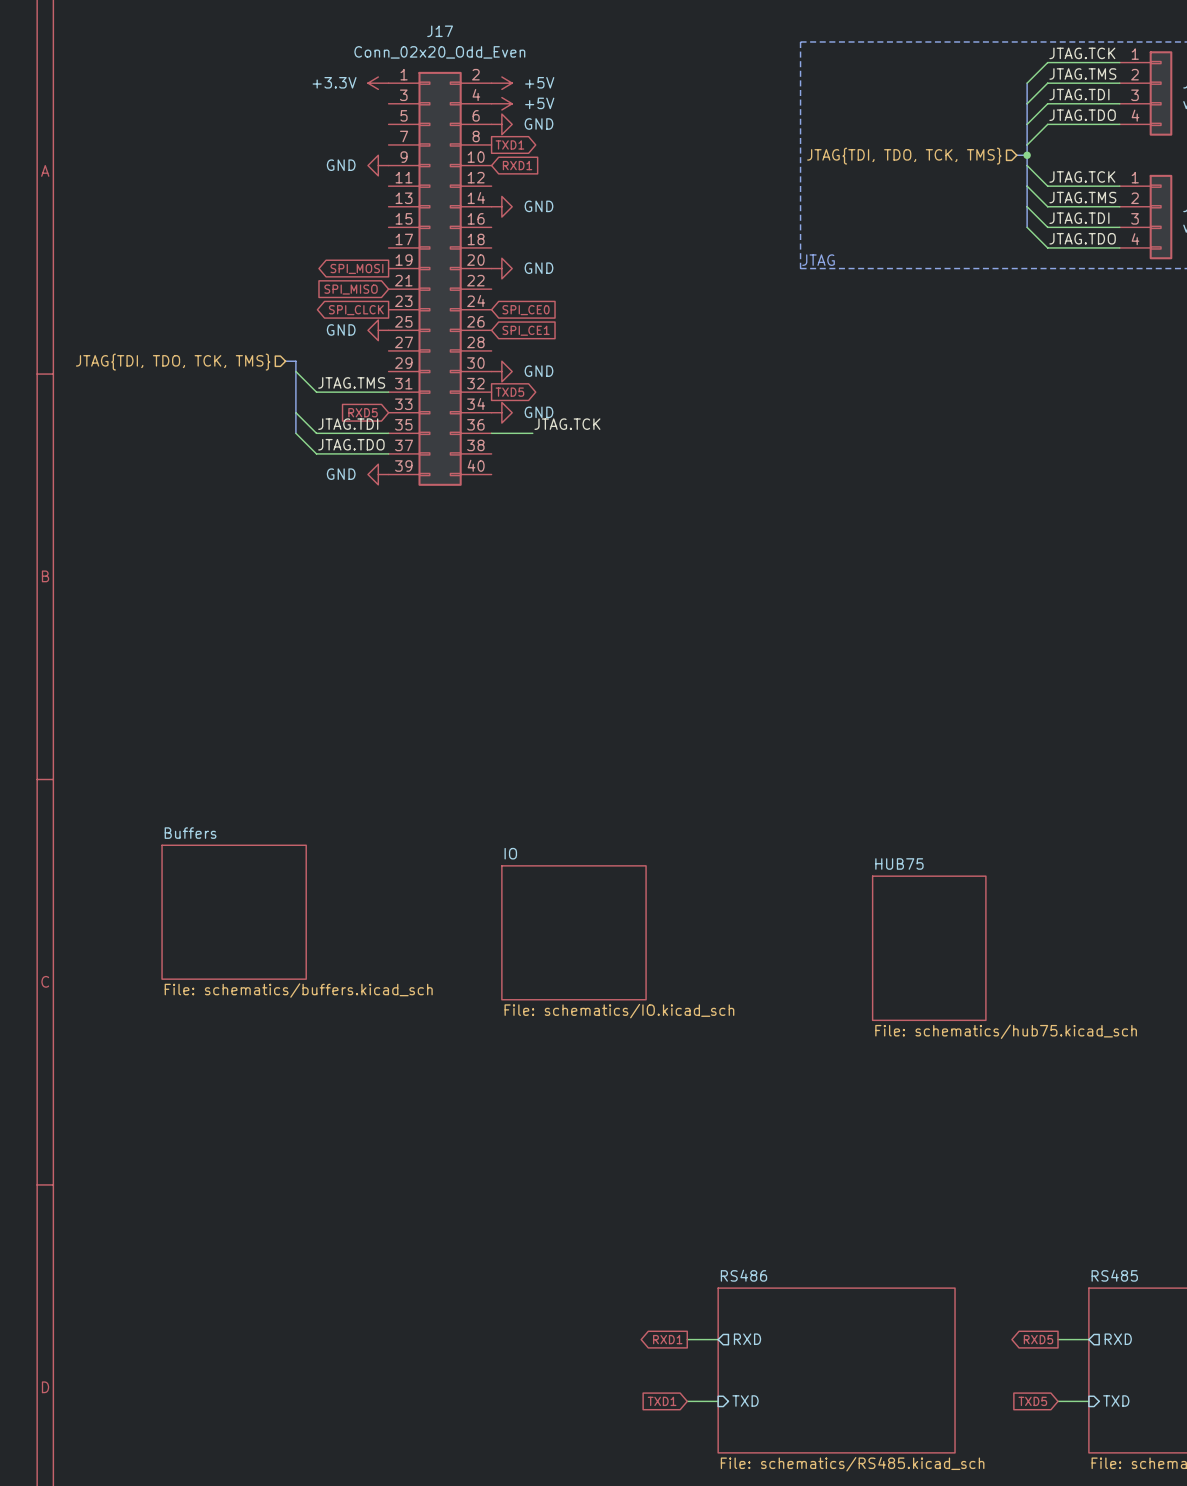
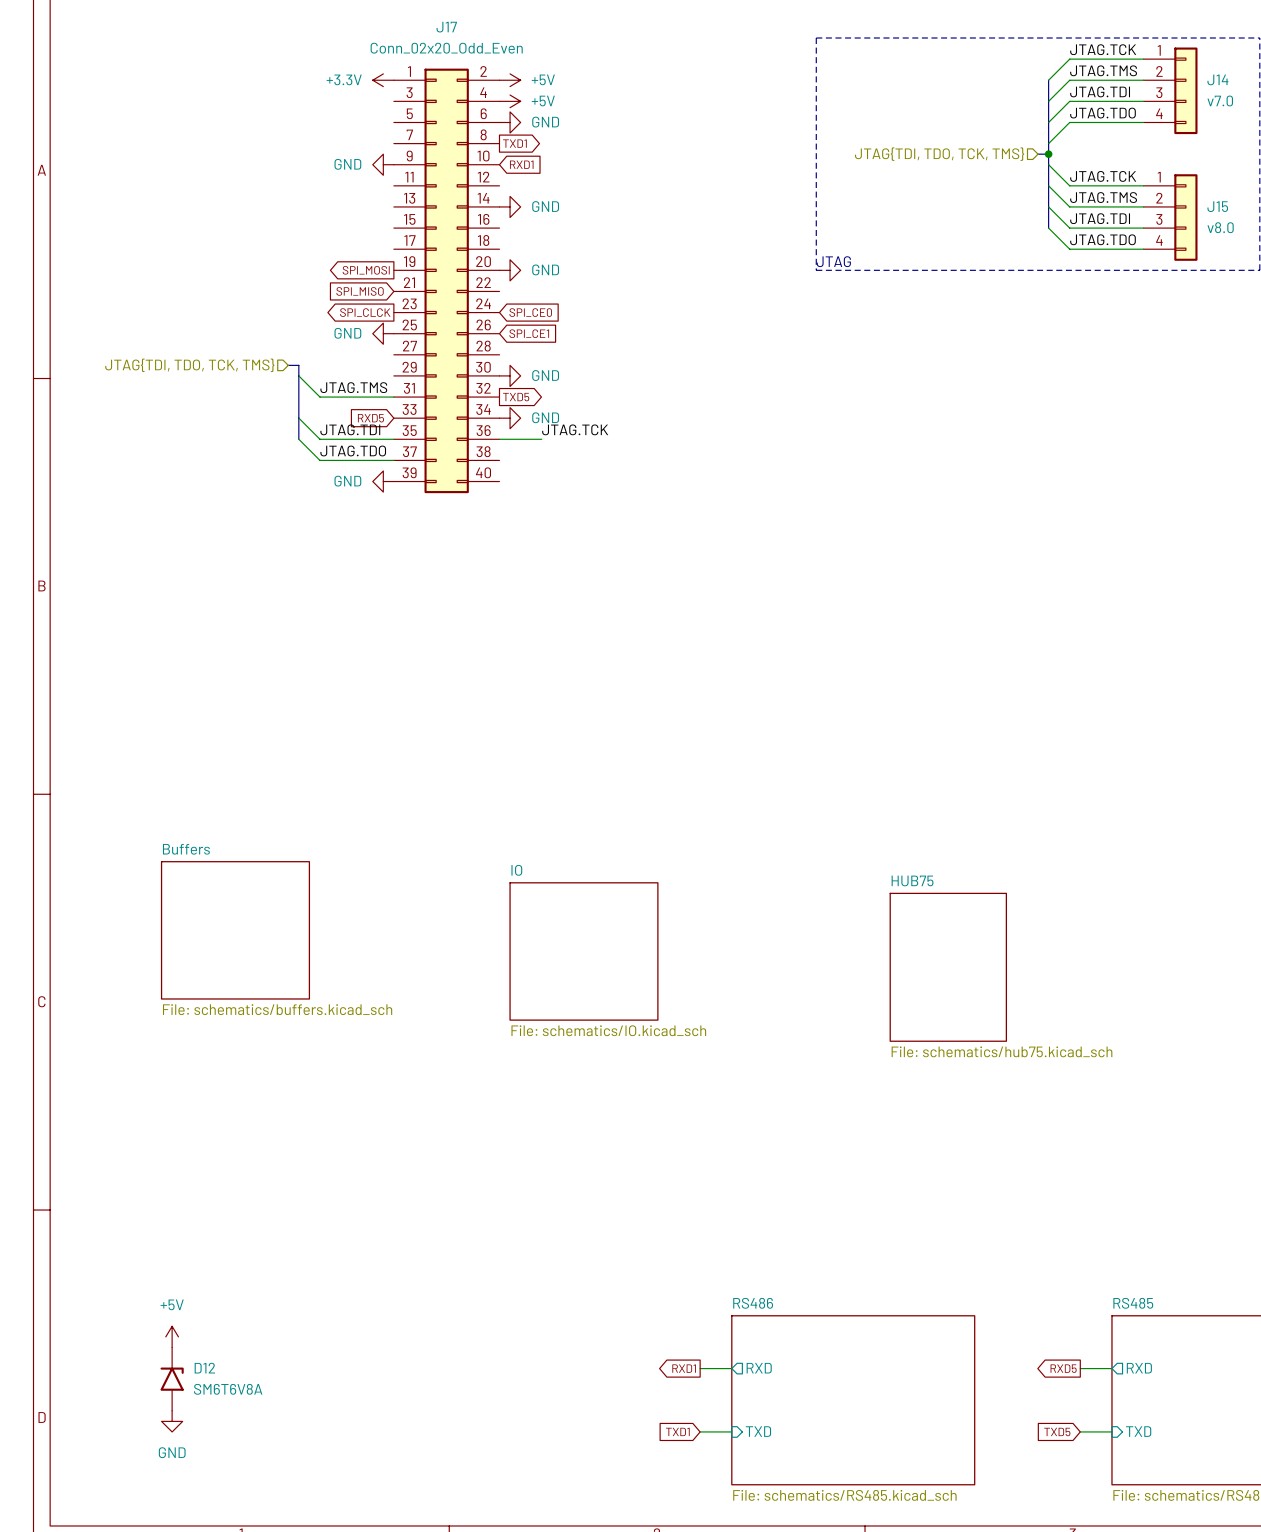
power symbol: none -> +5V (172, 1336)
D12: none -> SM6T6V8A (172, 1379)
power symbol: none -> GND (172, 1421)

